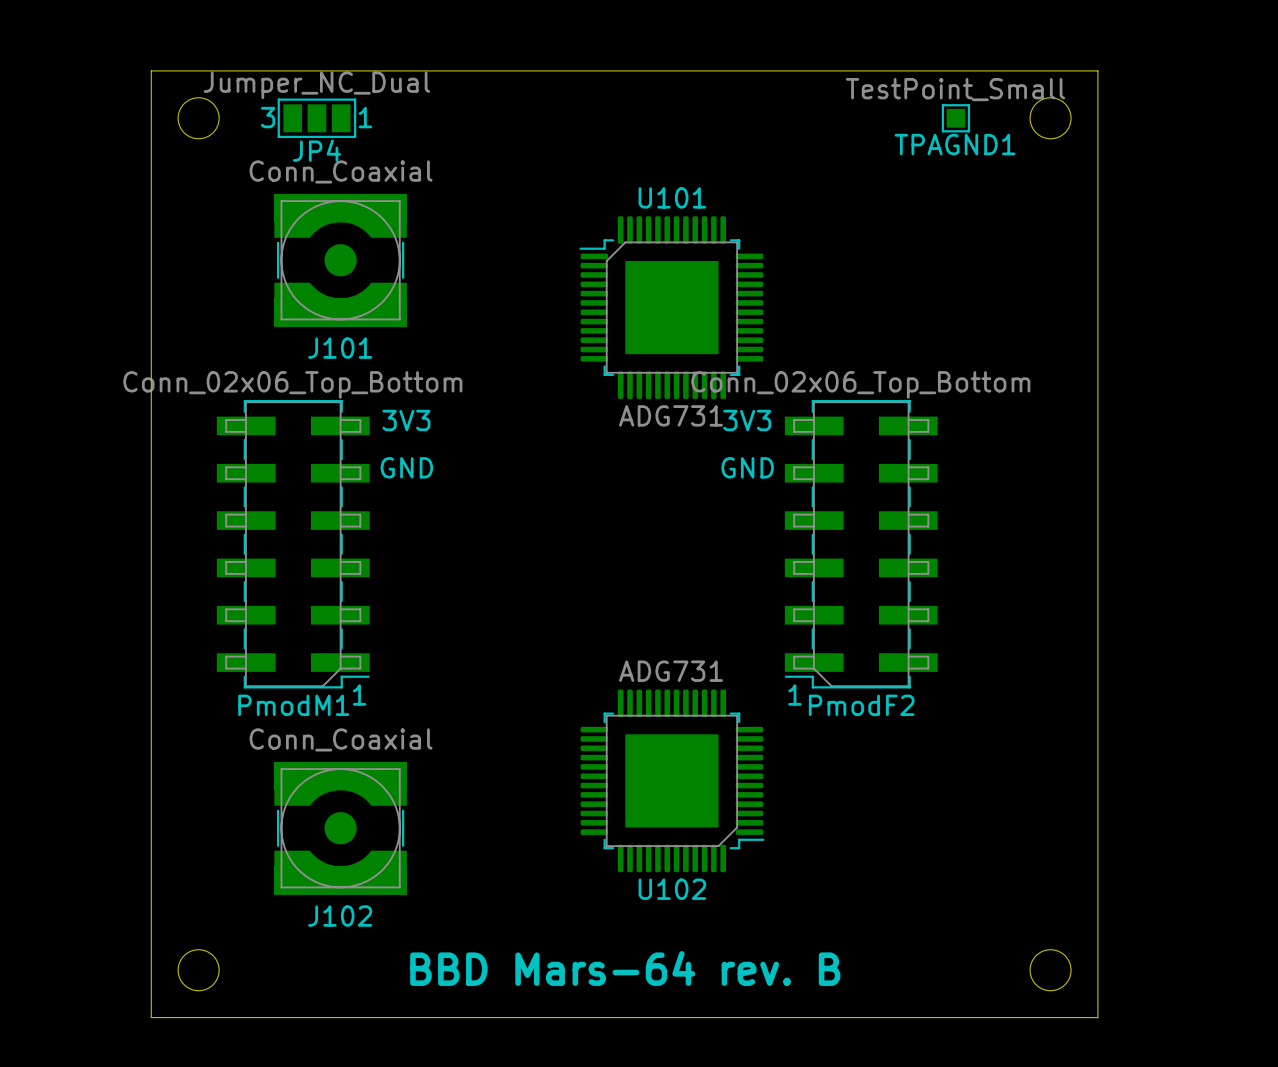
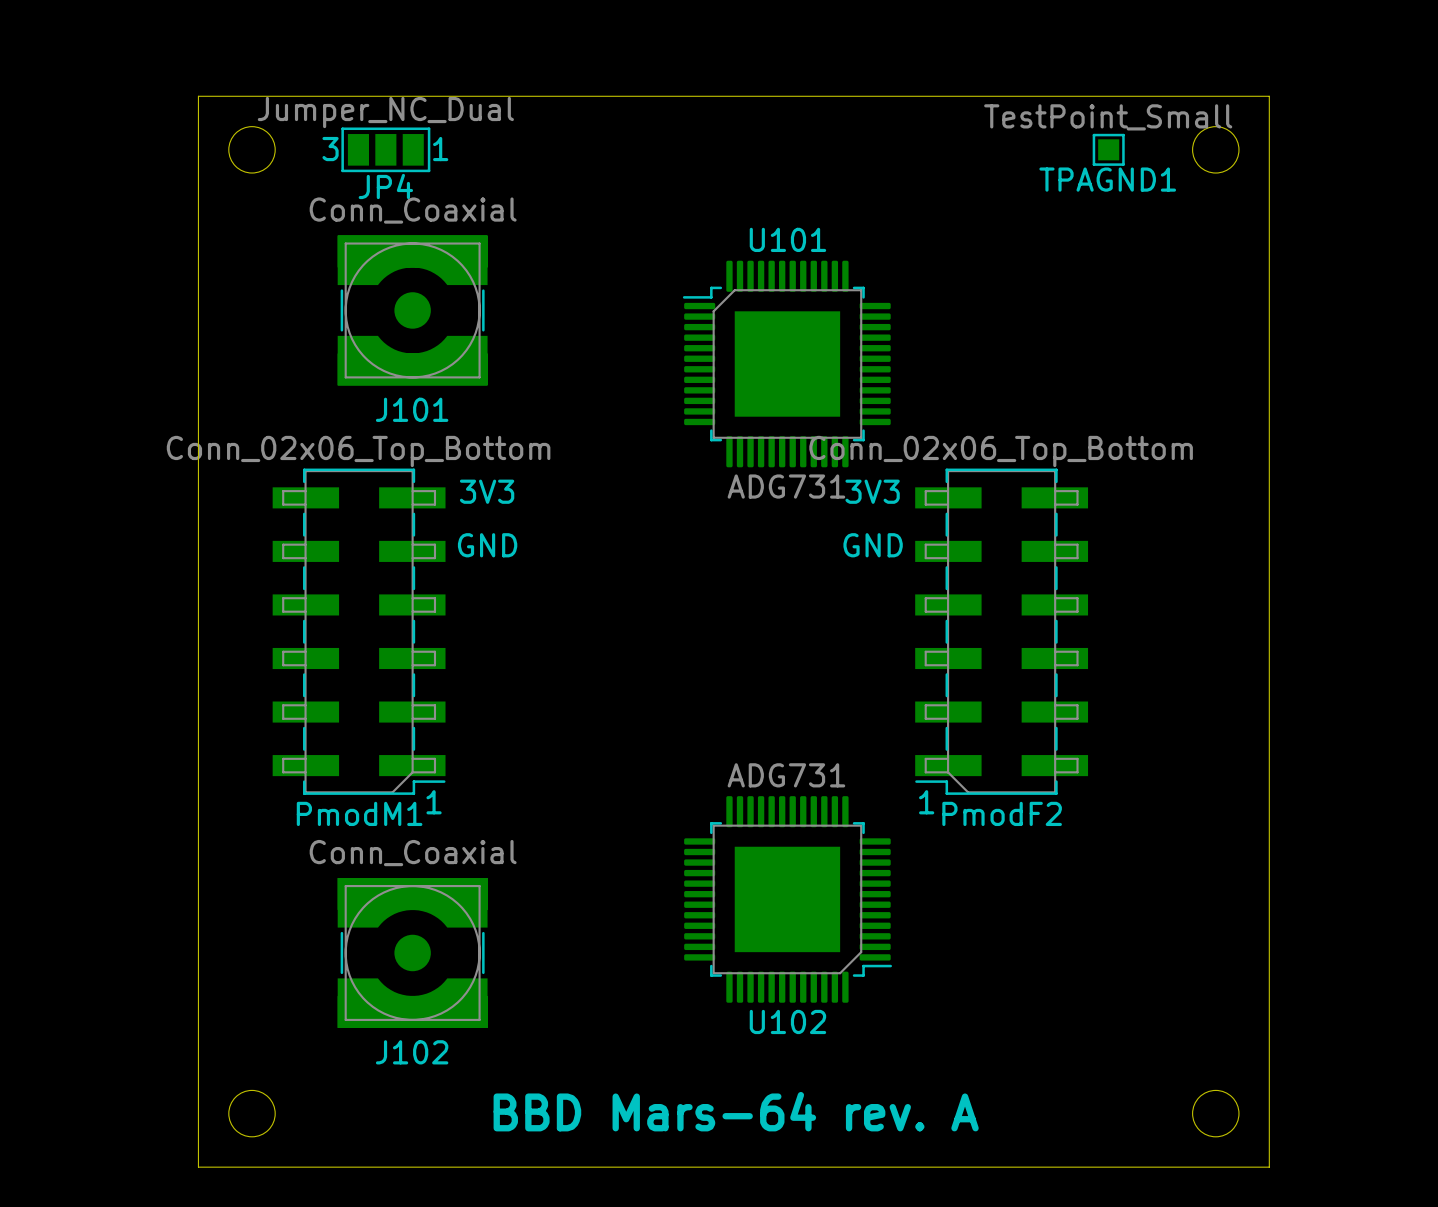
text: BBD Mars-64 rev. B (625, 968) -> BBD Mars-64 rev. A (736, 1111)

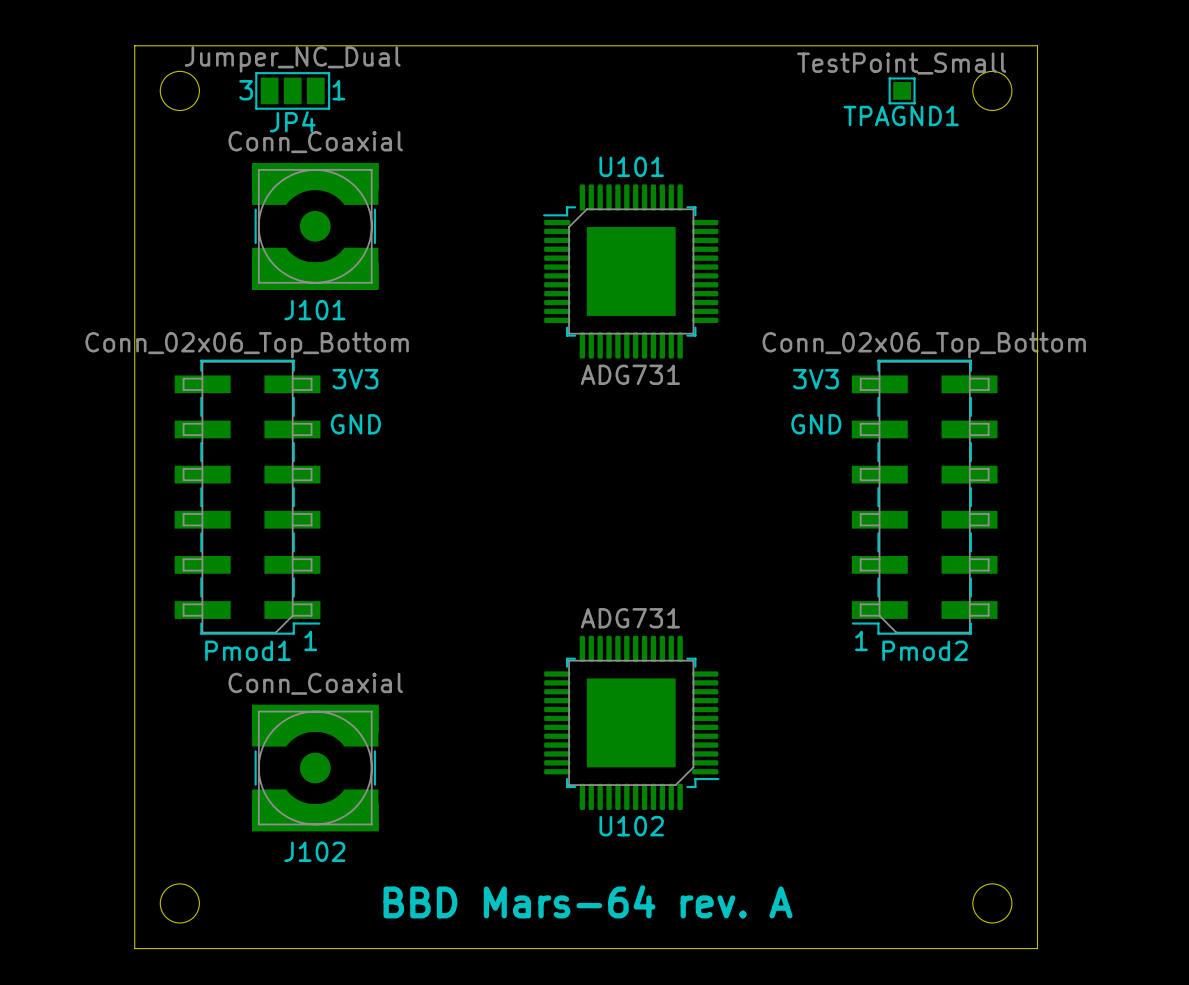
Pmod1: none -> Conn_02x06_Top_Bottom (247, 497)
PmodM1: Conn_02x06_Top_Bottom (359, 631) -> none
PmodF2: Conn_02x06_Top_Bottom (1001, 631) -> none
Pmod2: none -> Conn_02x06_Top_Bottom (924, 497)

